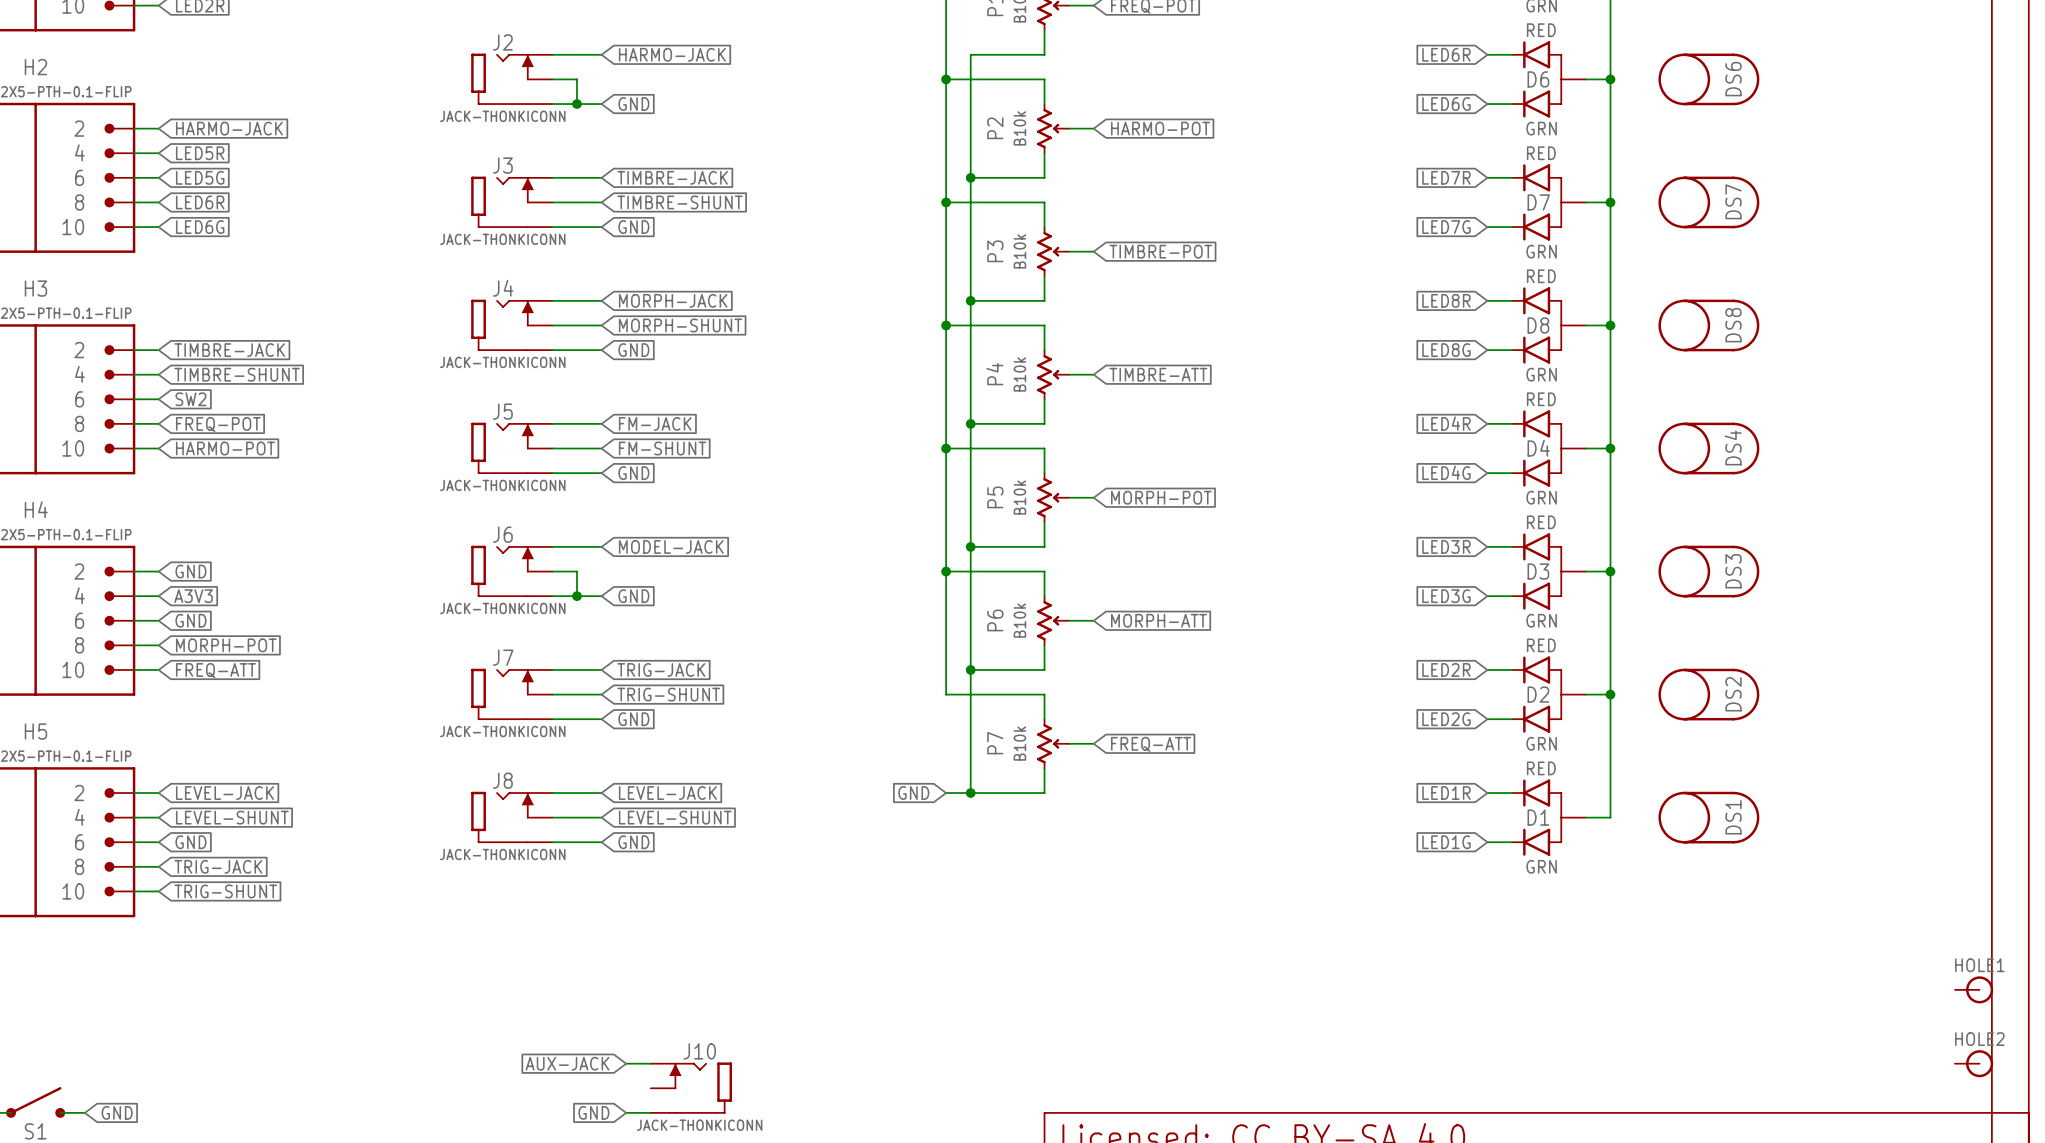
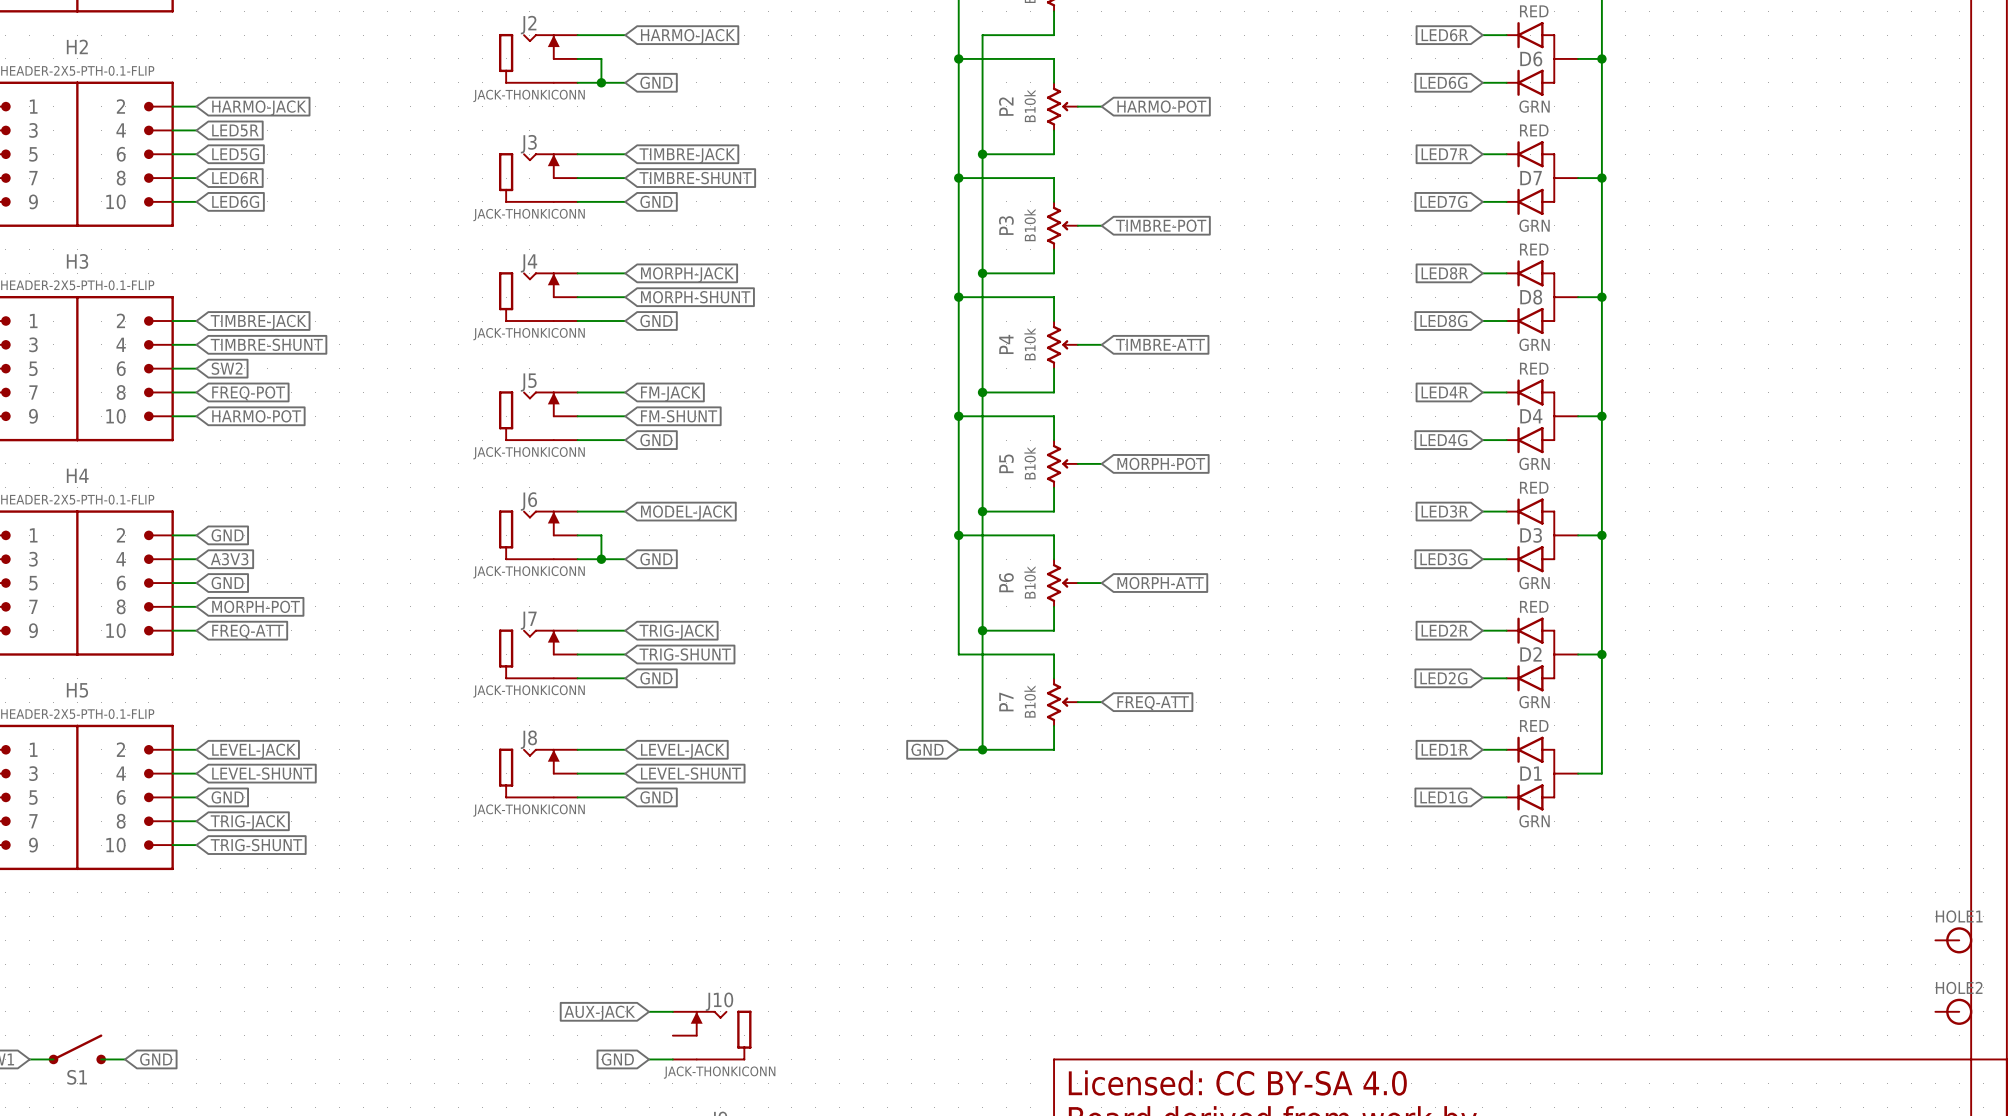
DS6: (1708, 79) -> none
DS7: (1708, 202) -> none
DS8: (1708, 325) -> none
DS4: (1708, 448) -> none
DS3: (1708, 571) -> none
DS2: (1708, 694) -> none
DS1: (1708, 817) -> none

